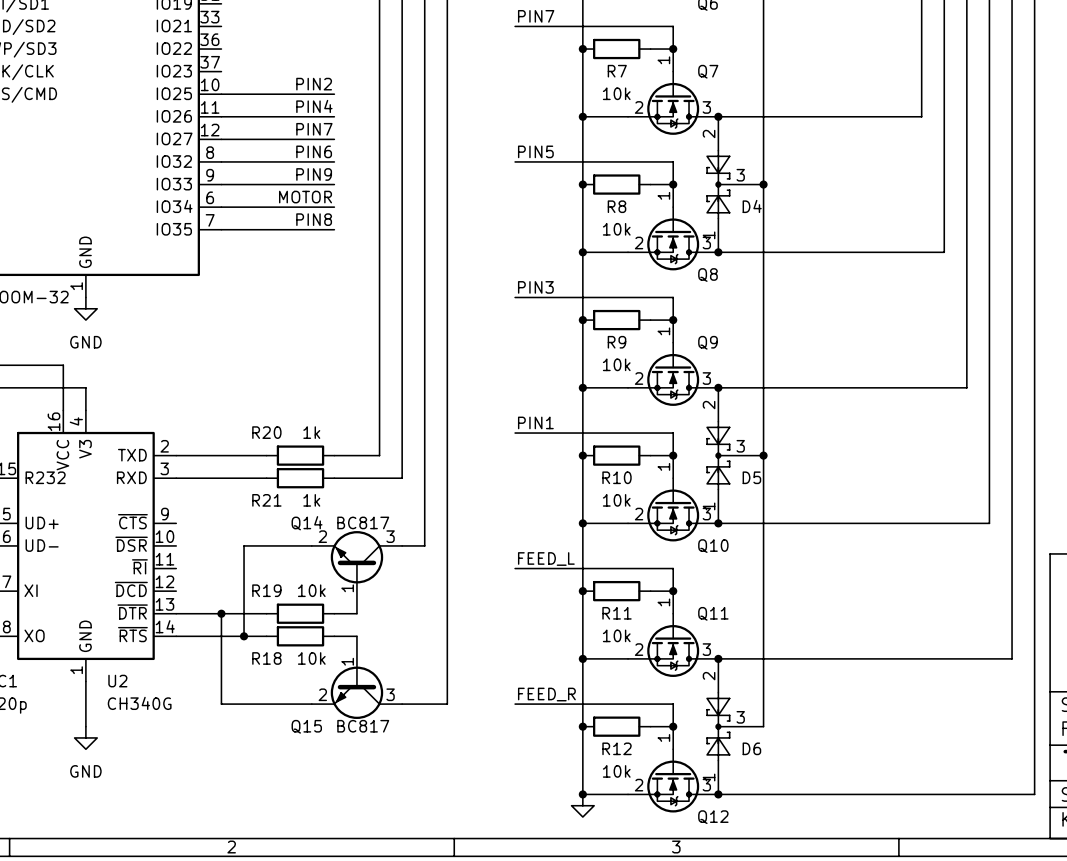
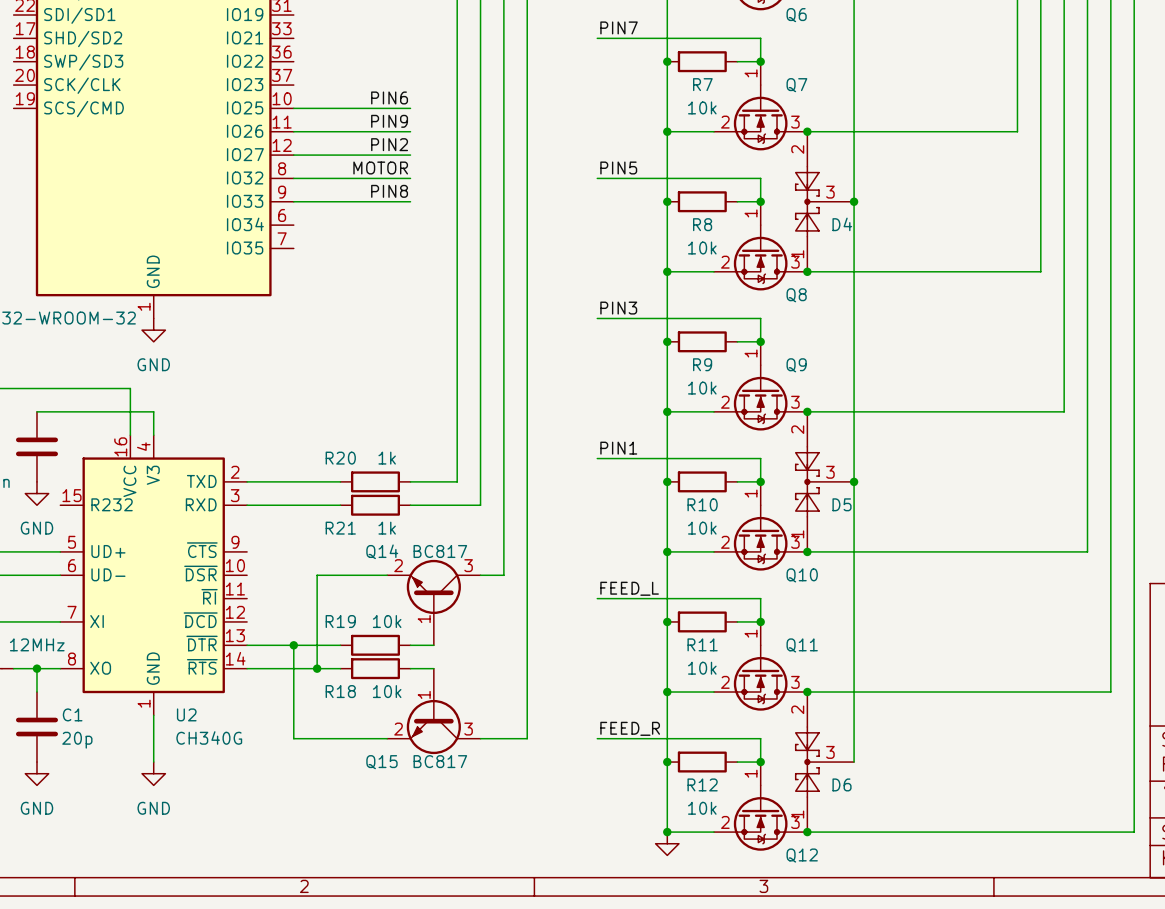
label: PIN2 (314, 84) -> PIN6 (389, 97)
label: PIN4 (314, 106) -> PIN9 (389, 121)
label: PIN7 (314, 129) -> PIN2 (389, 144)
label: PIN6 (314, 151) -> MOTOR (380, 168)
label: PIN9 (314, 174) -> PIN8 (389, 191)
label: MOTOR (305, 197) -> none
wire: (221, 207) (334, 207) -> none
label: PIN8 (314, 219) -> none
wire: (221, 229) (334, 229) -> none

